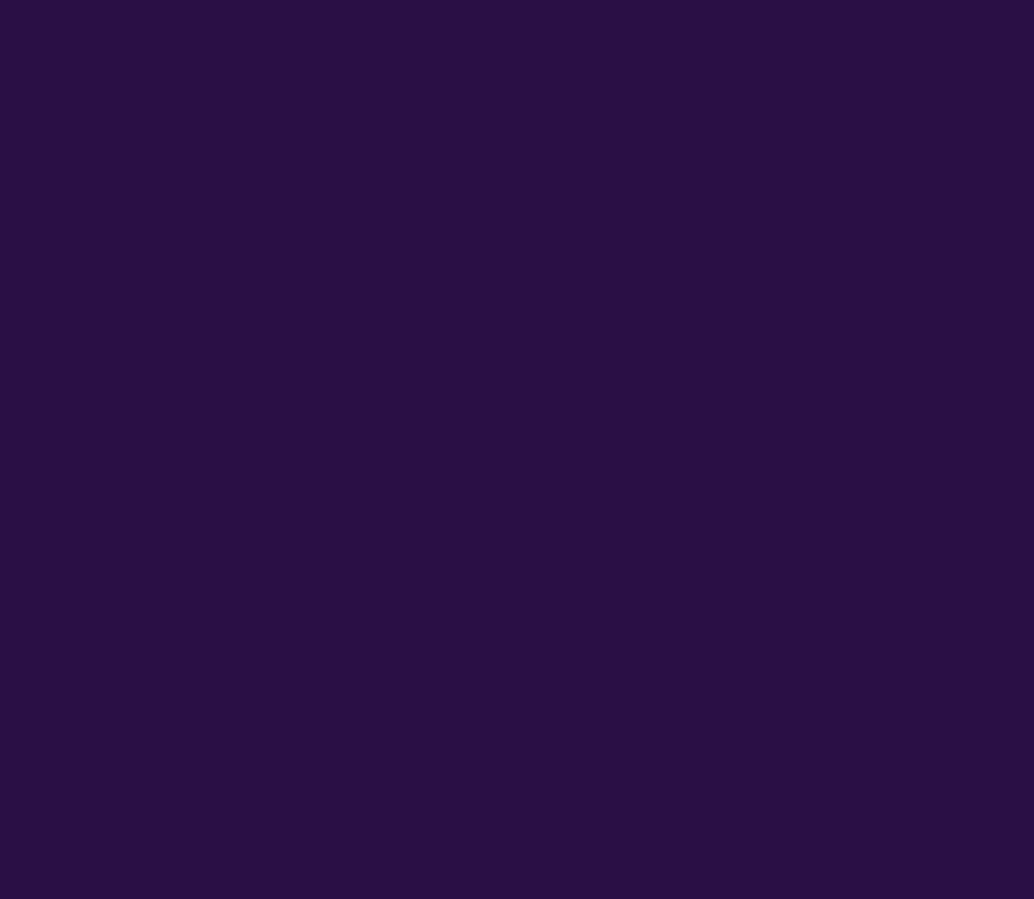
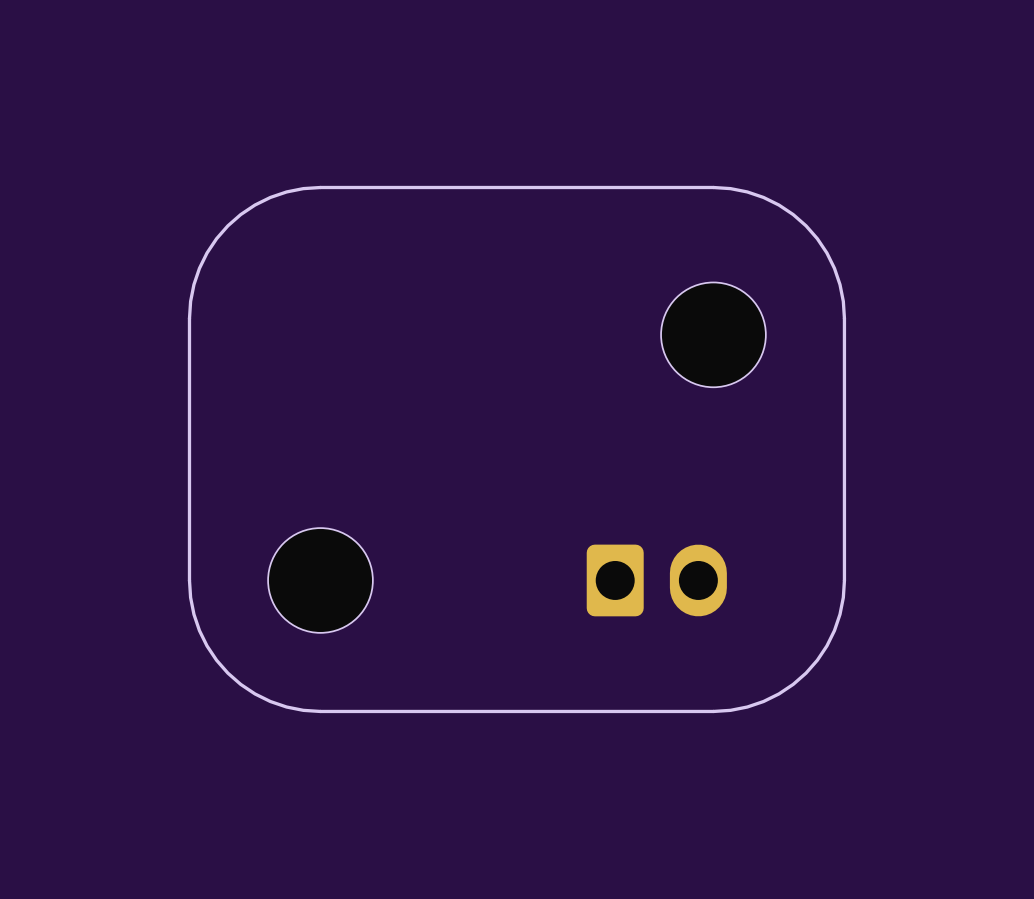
board edge: none -> (713, 187) (303, 188) (270, 197) (254, 205) (227, 225) (216, 238) (199, 268) (190, 301) (189, 580) (193, 614) (199, 630) (207, 645) (227, 673) (254, 693) (270, 701) (286, 707) (320, 711) (730, 710) (763, 701) (793, 684) (806, 673) (817, 660) (834, 630) (843, 597) (843, 301) (834, 268) (826, 252) (806, 225) (778, 205) (763, 197) (747, 191) (713, 187)
part: none -> (713, 334)
part: none -> (320, 580)
part: none -> (656, 580)

